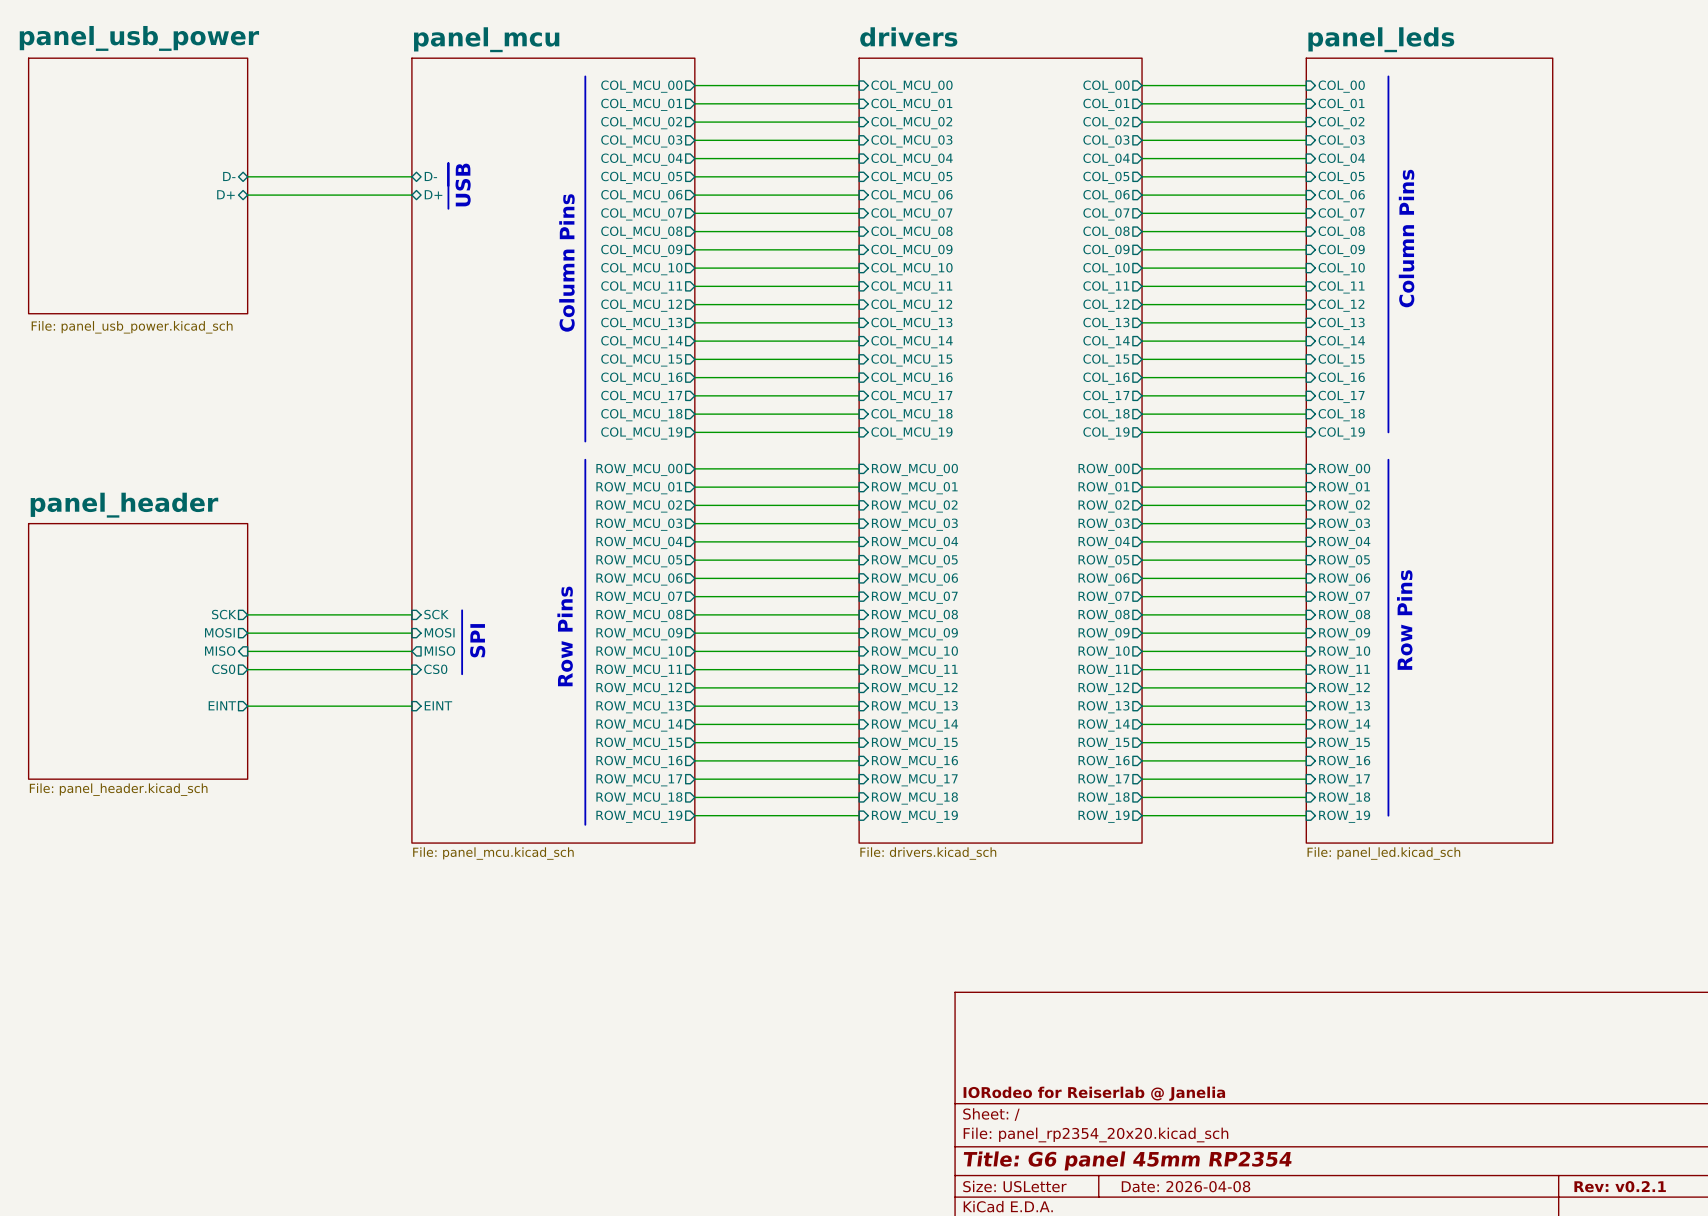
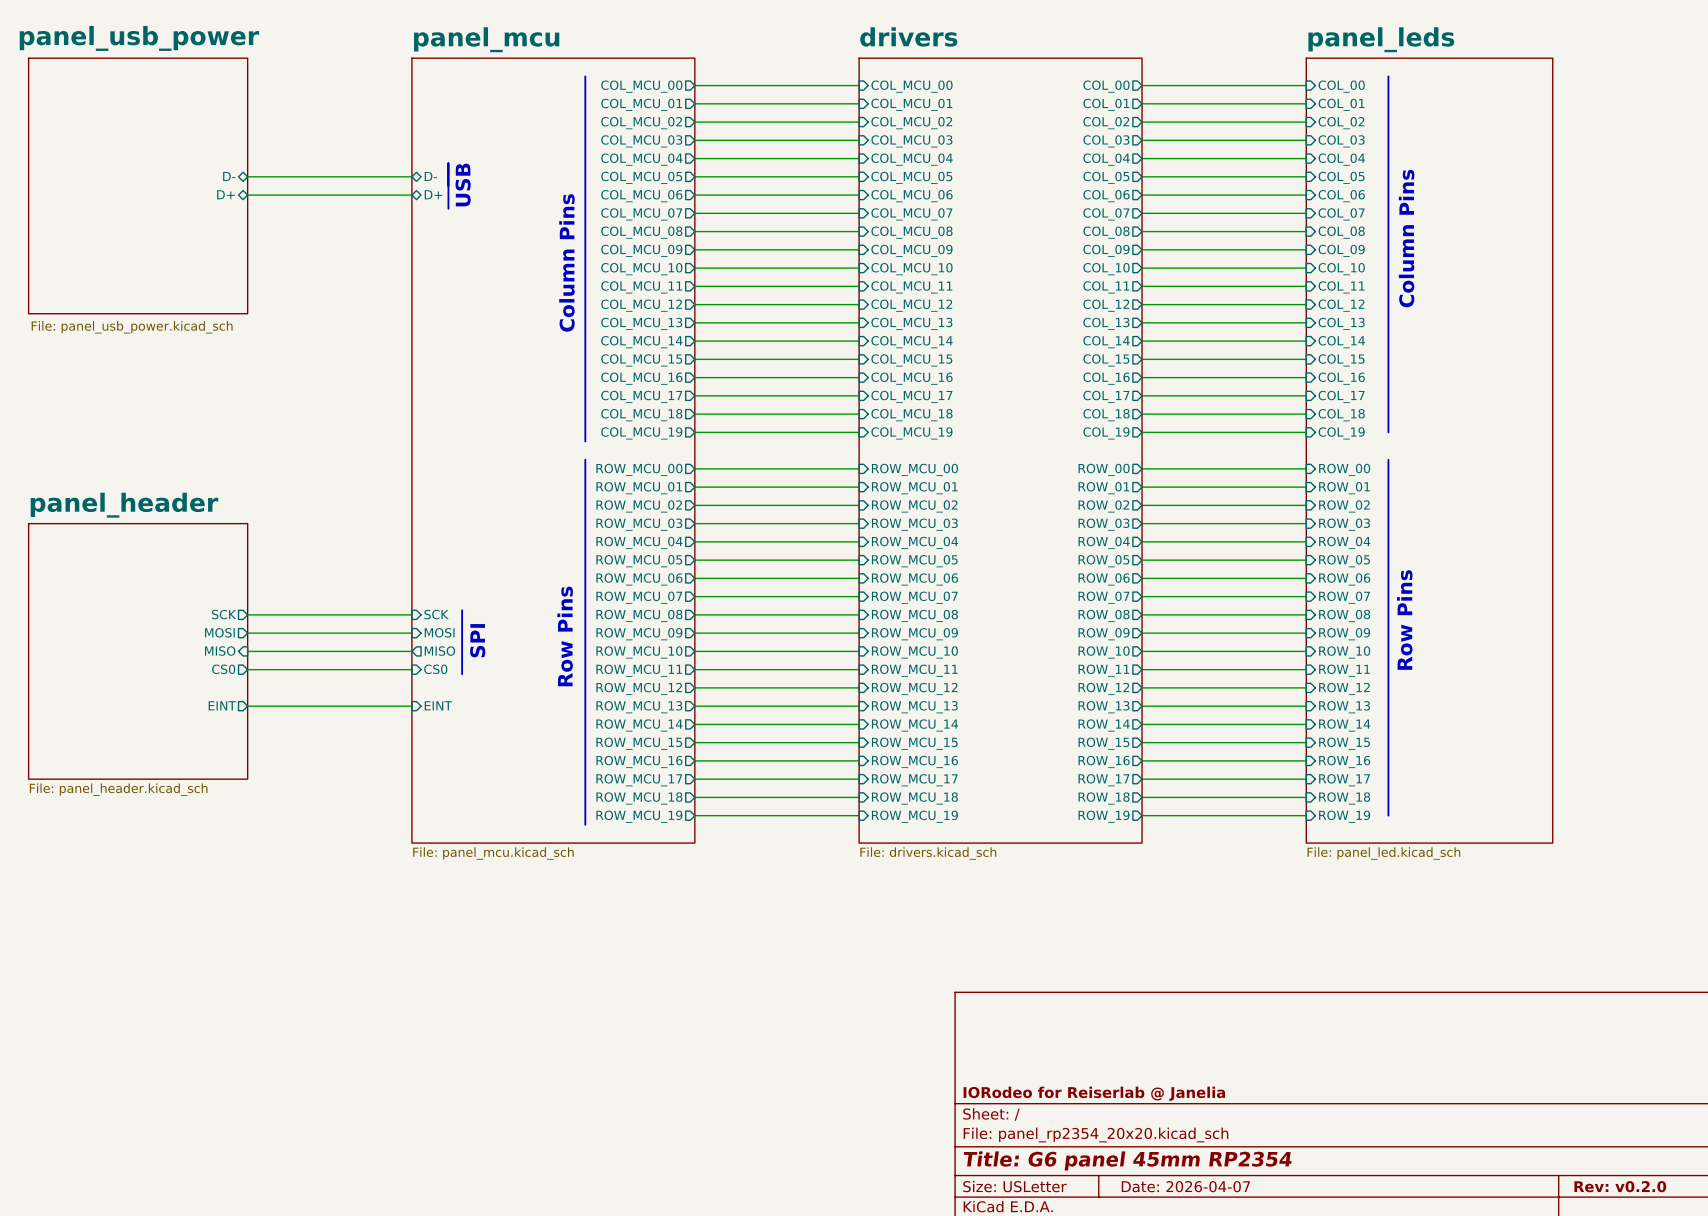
title block: Date: 2026-04-08 (1186, 1186) -> Date: 2026-04-07 (1185, 1186)
title block: Rev: v0.2.1 (1620, 1186) -> Rev: v0.2.0 (1620, 1186)

